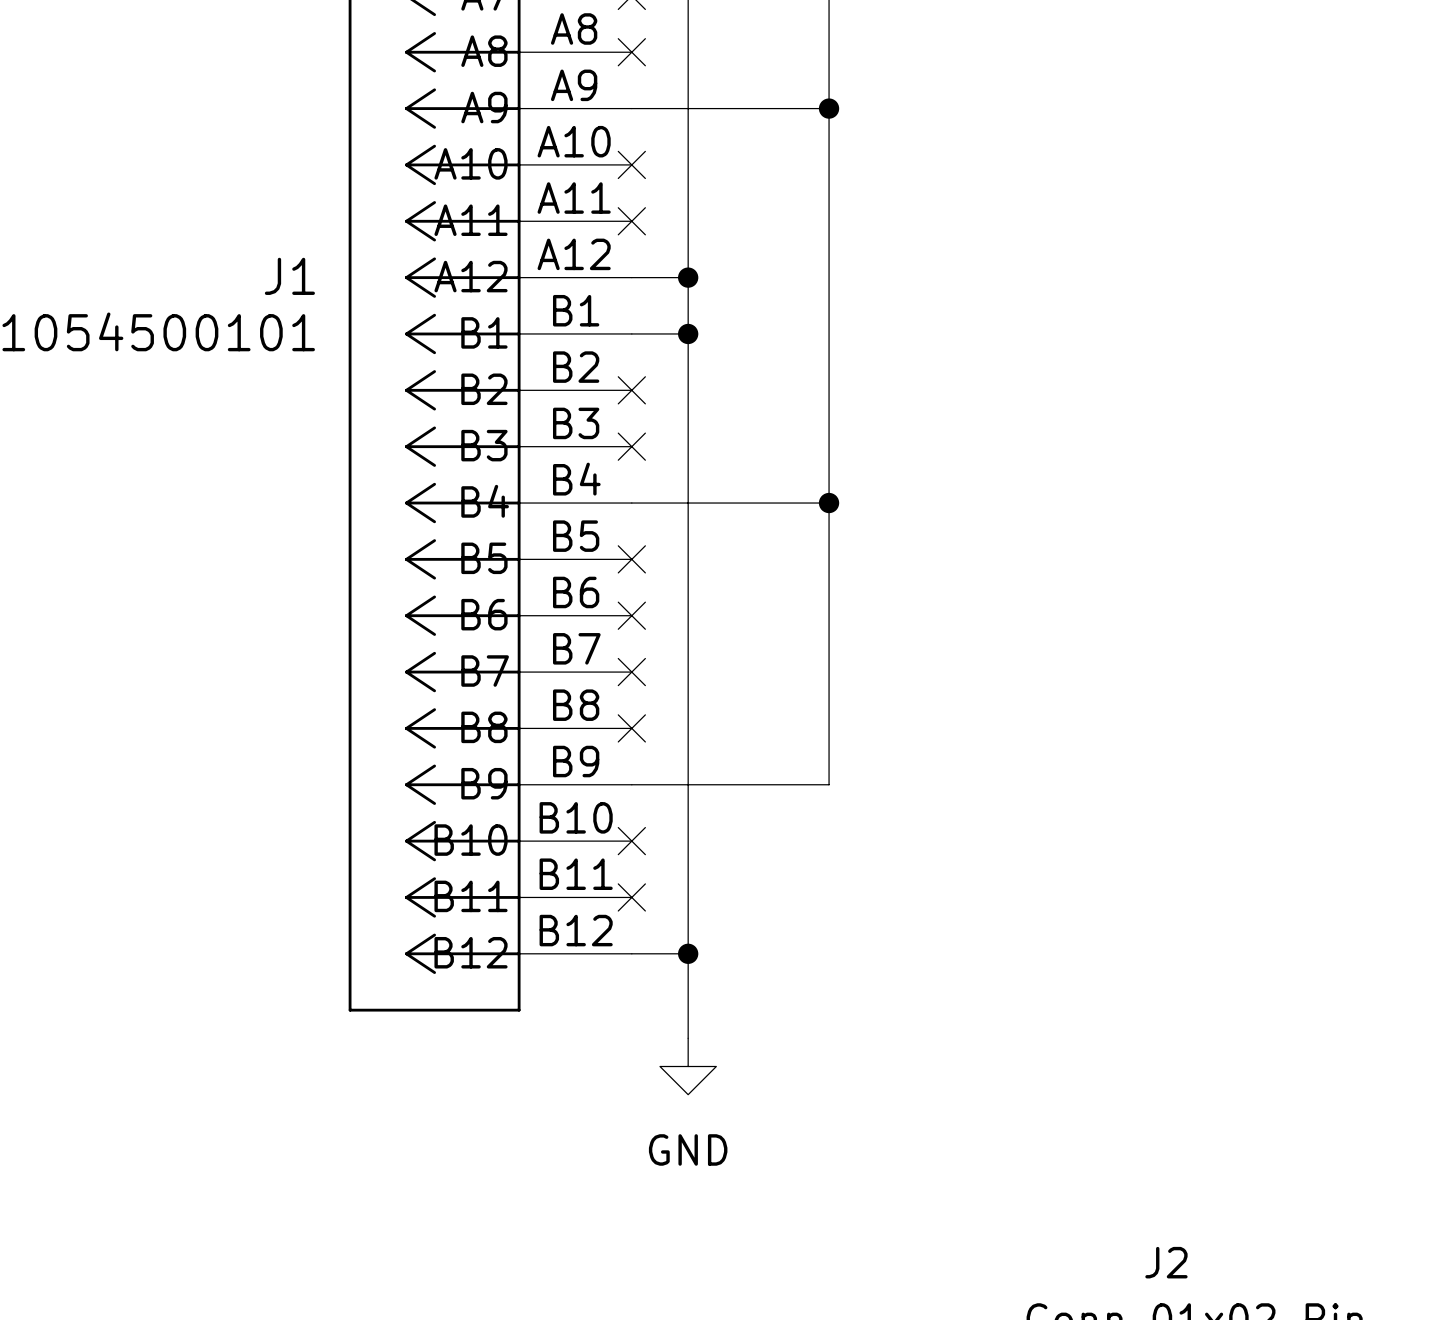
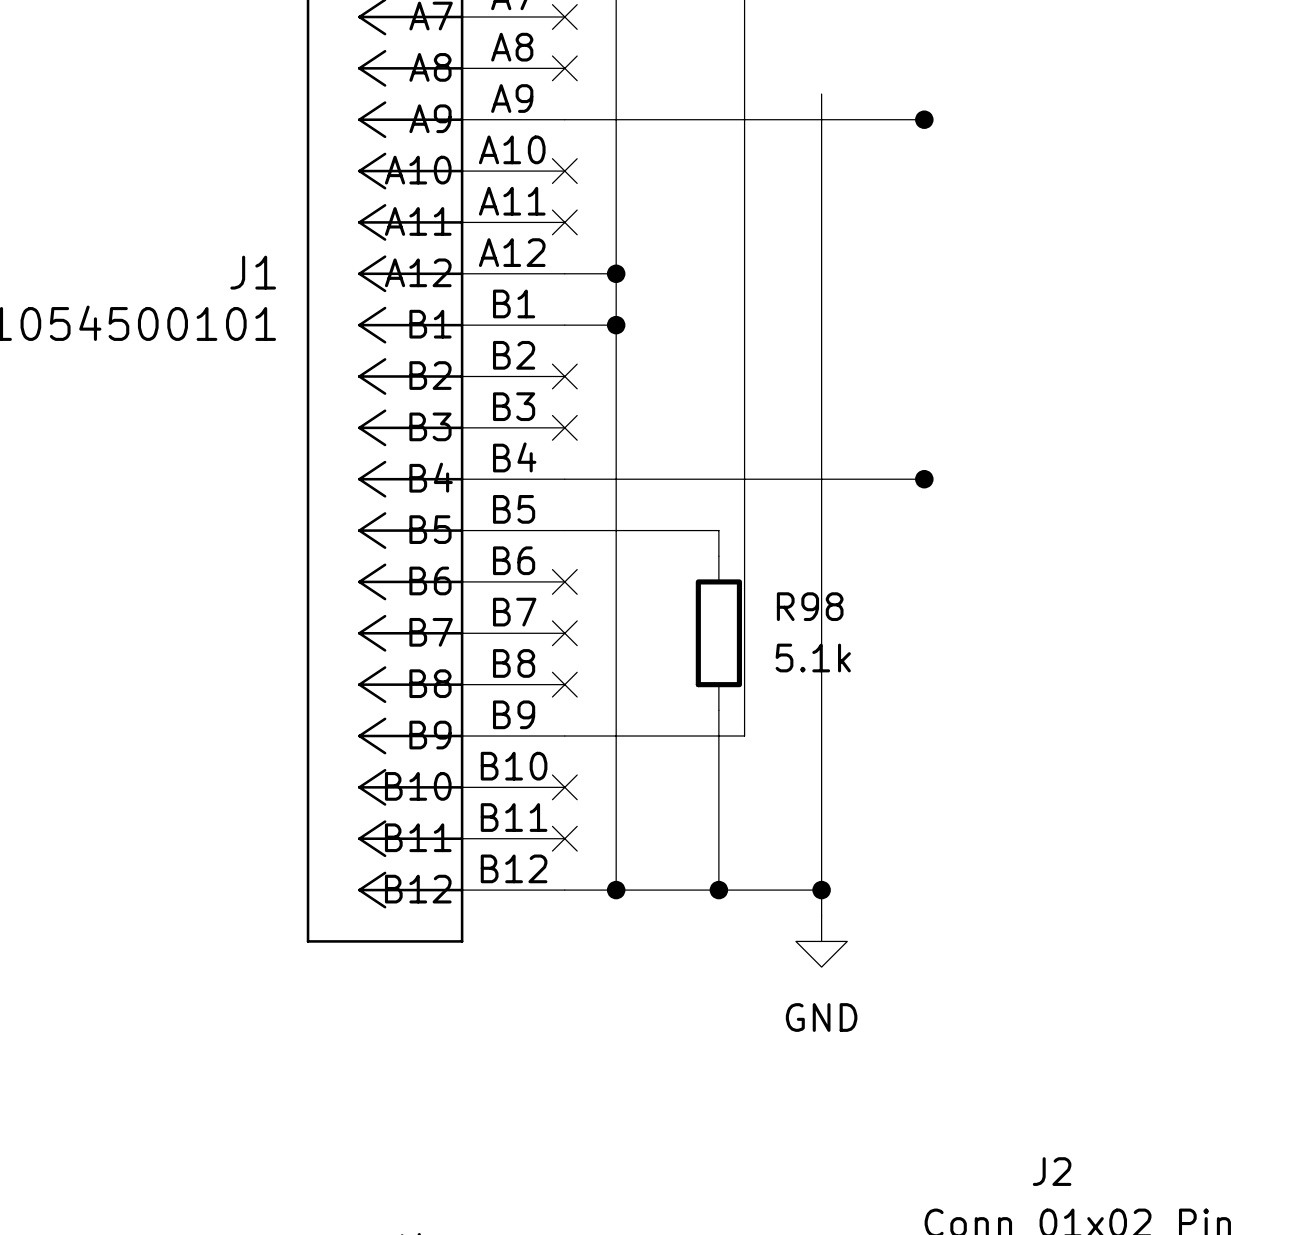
wire: none -> (821, 94) (821, 915)
wire: none -> (744, 119) (924, 119)
junction: (829, 108) -> none
junction: none -> (924, 119)
wire: none -> (744, 479) (924, 479)
junction: (829, 503) -> none
junction: none -> (924, 479)
wire: none -> (564, 530) (718, 530) (718, 556)
no-connect mark: (631, 559) -> none
R98: none -> 5.1k (718, 633)
wire: none -> (718, 710) (718, 890)
wire: (688, 953) (688, 1038) -> (616, 890) (821, 890)
junction: none -> (718, 890)
junction: none -> (821, 890)
power symbol position: GND (688, 1066) -> GND (821, 941)

